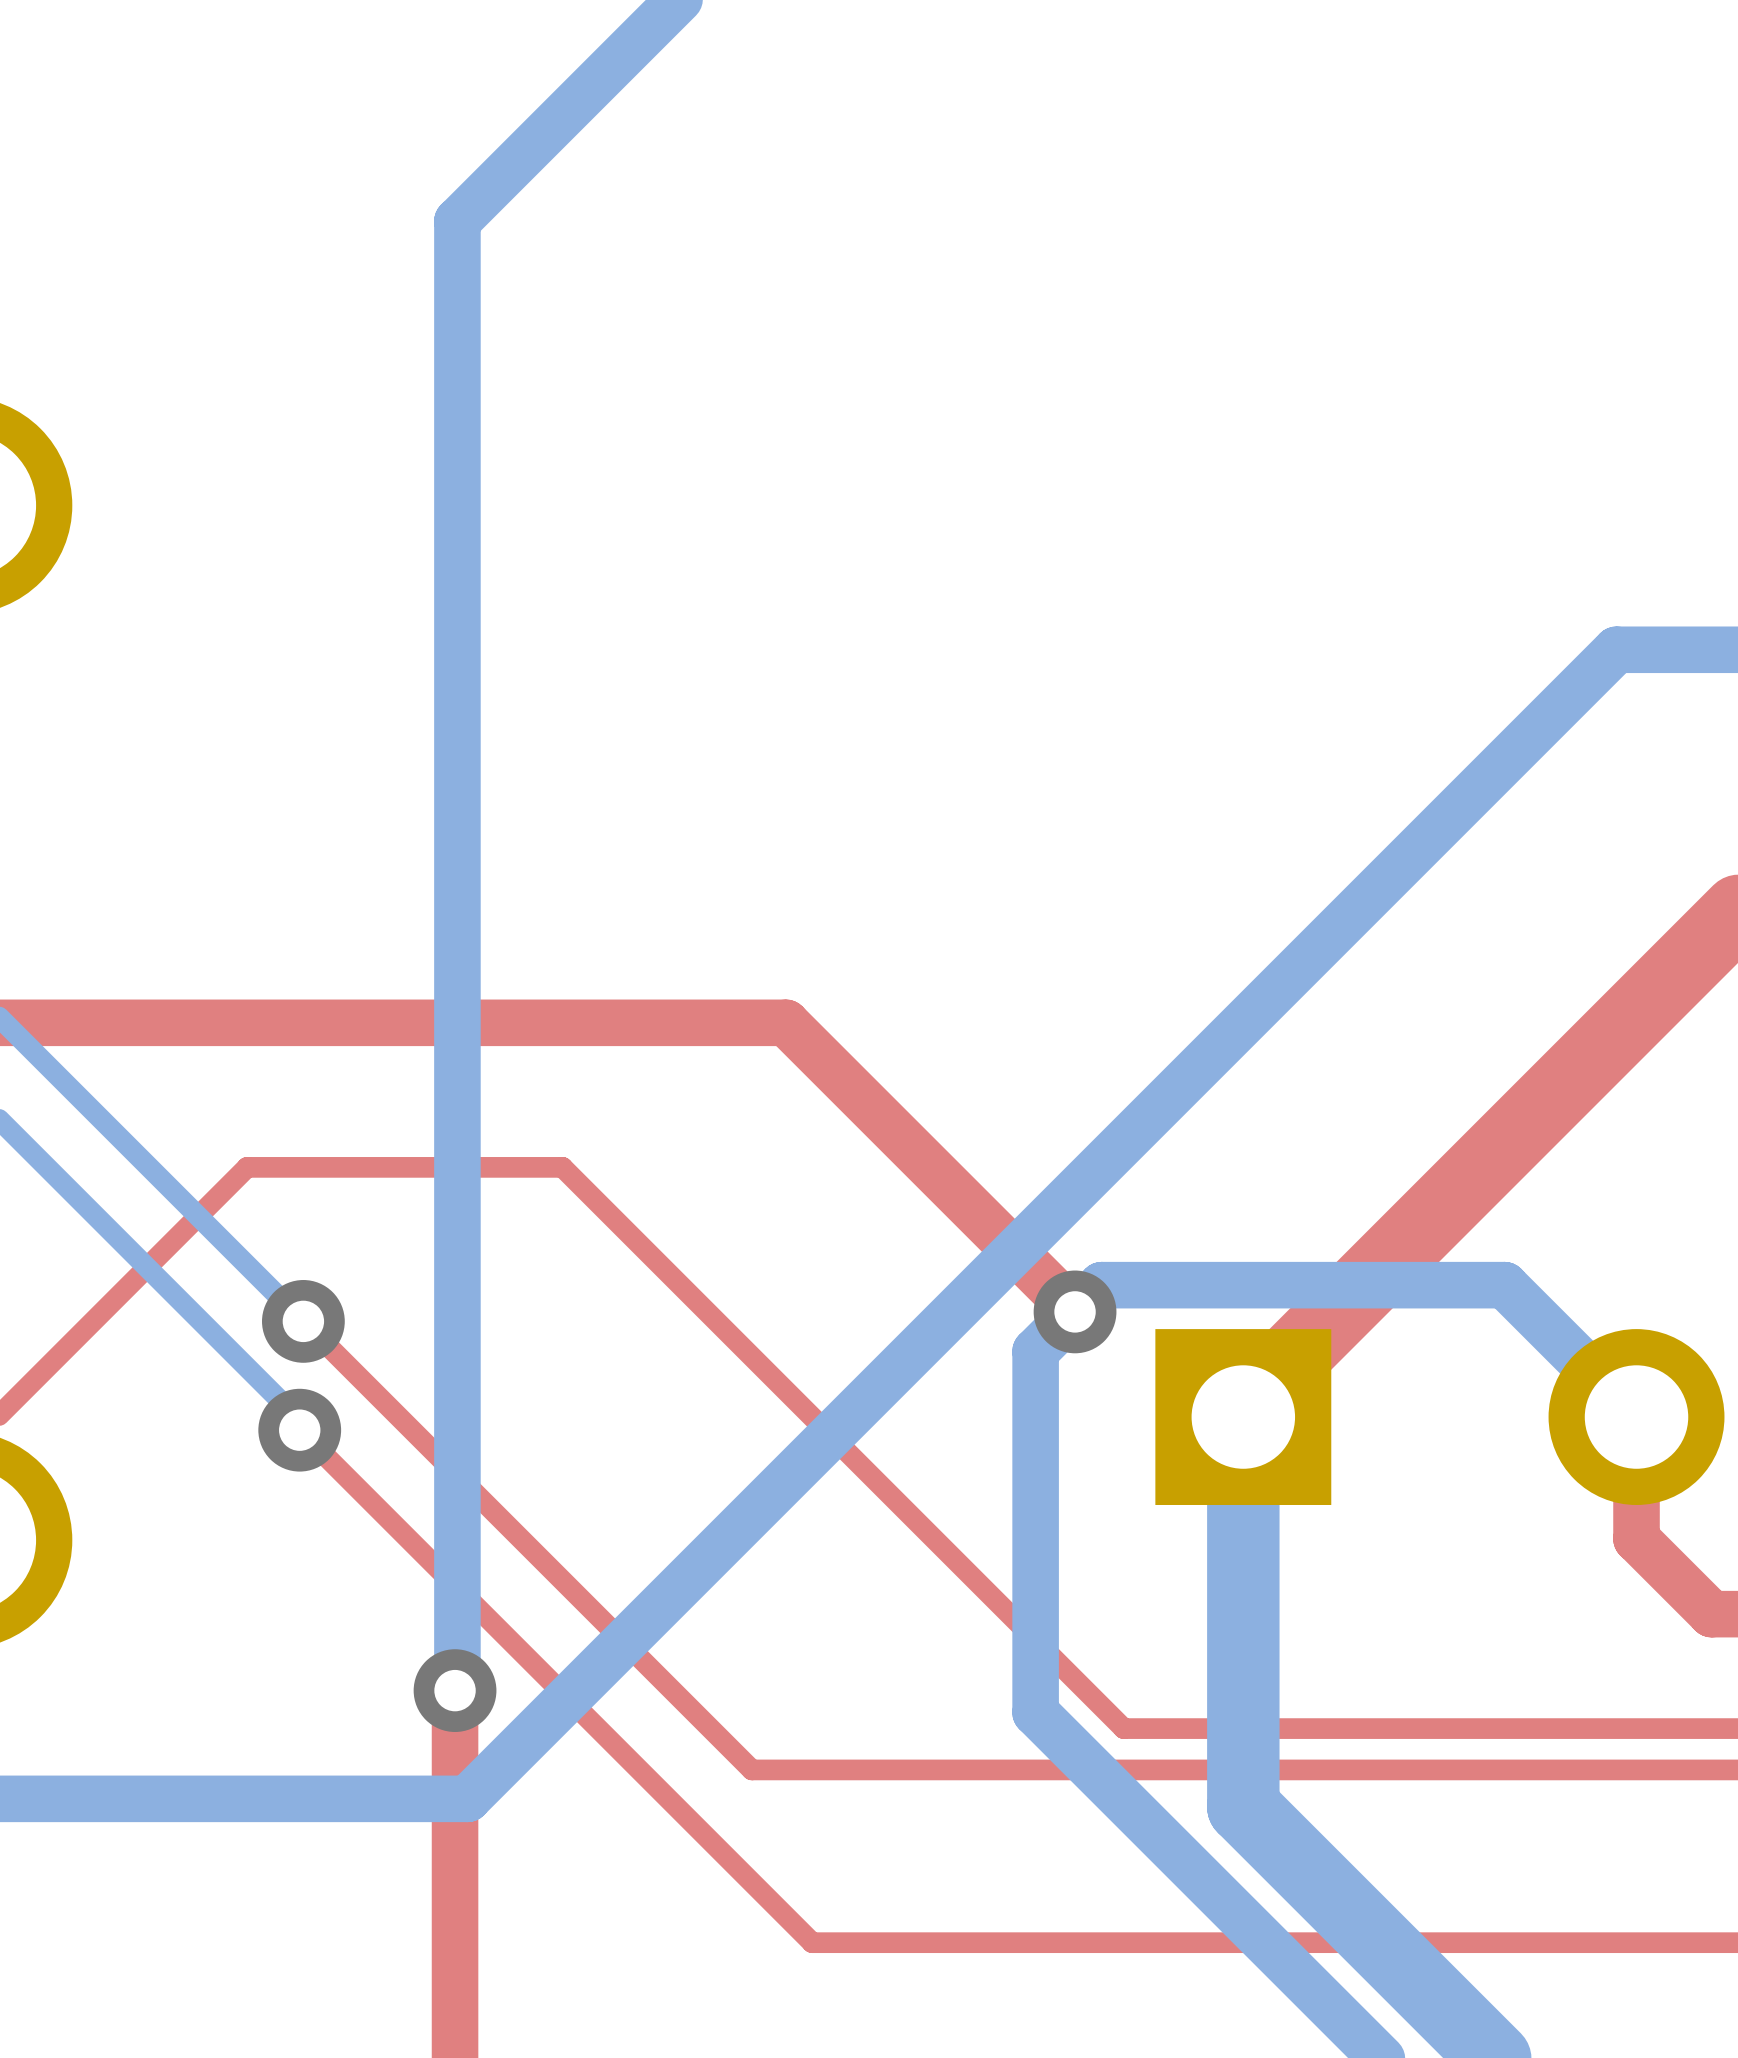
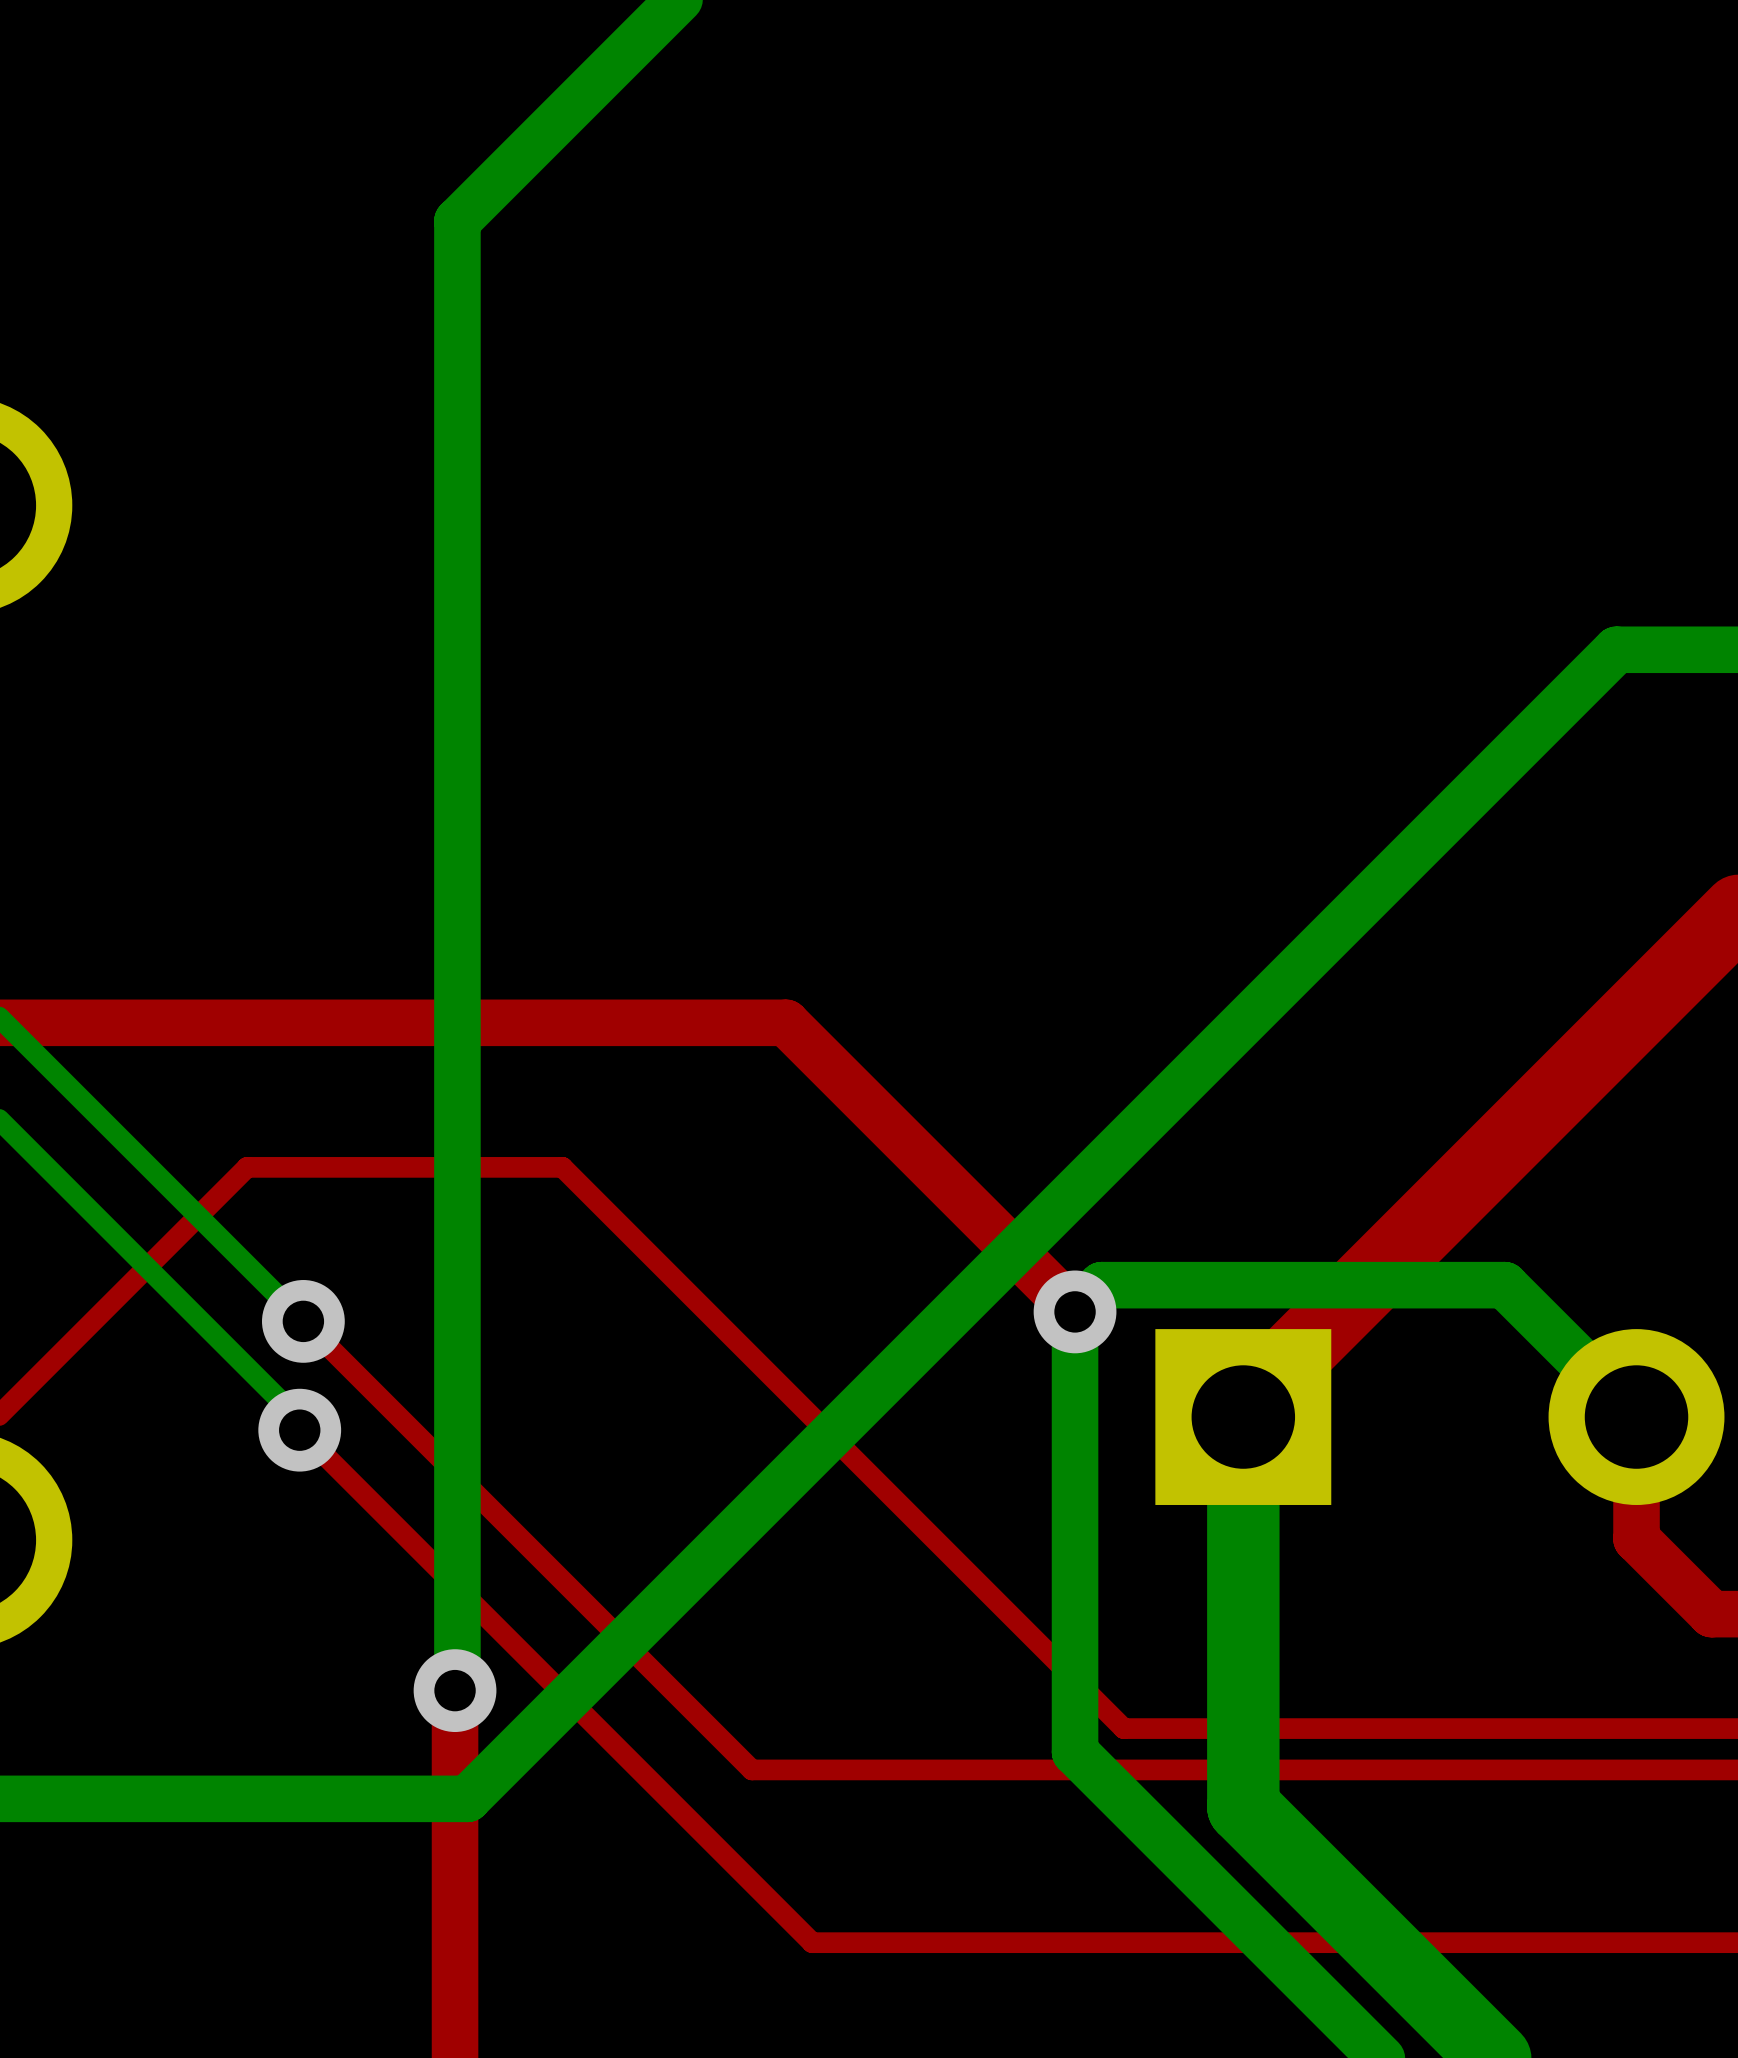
bottom track: (1075, 1311) (1035, 1351) (1035, 1712) (1075, 1752) -> (1075, 1311) (1075, 1752)

